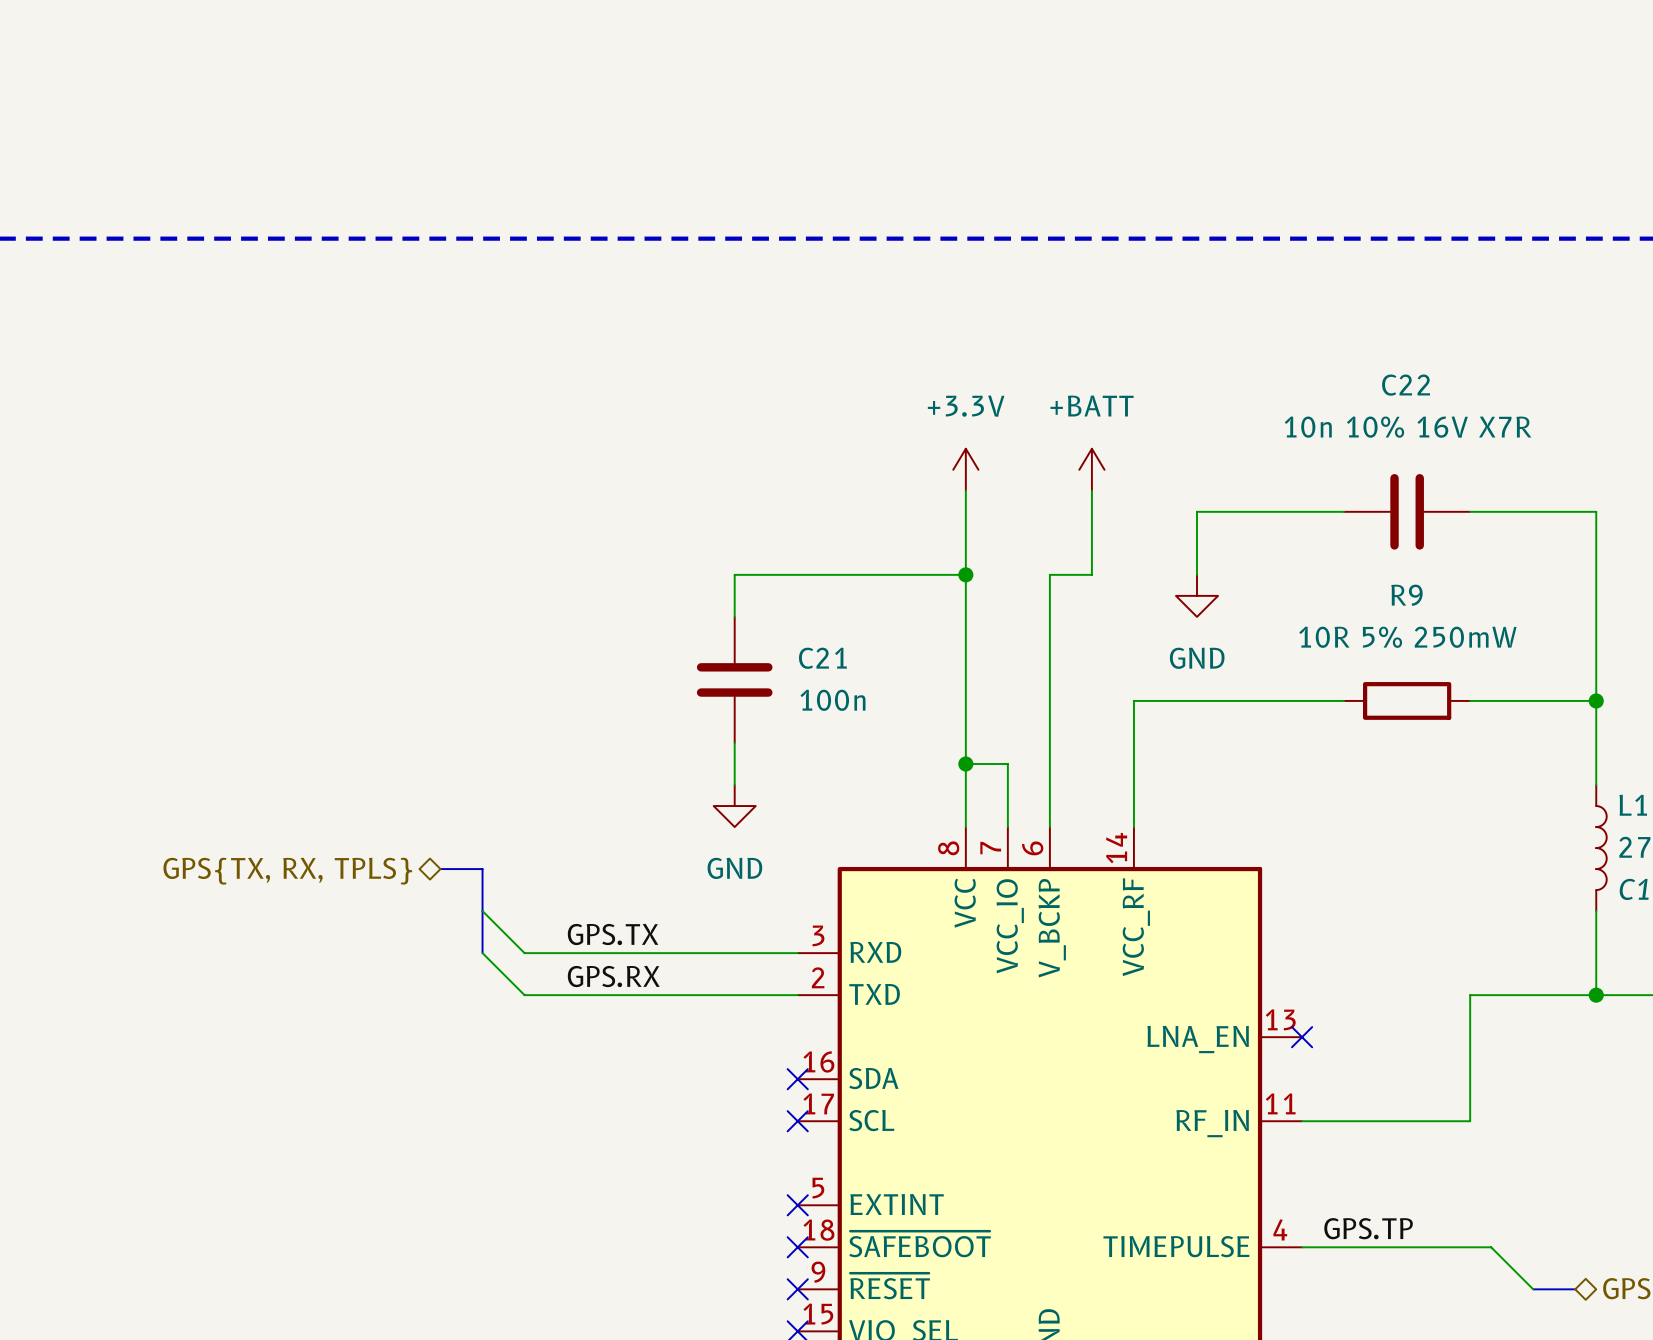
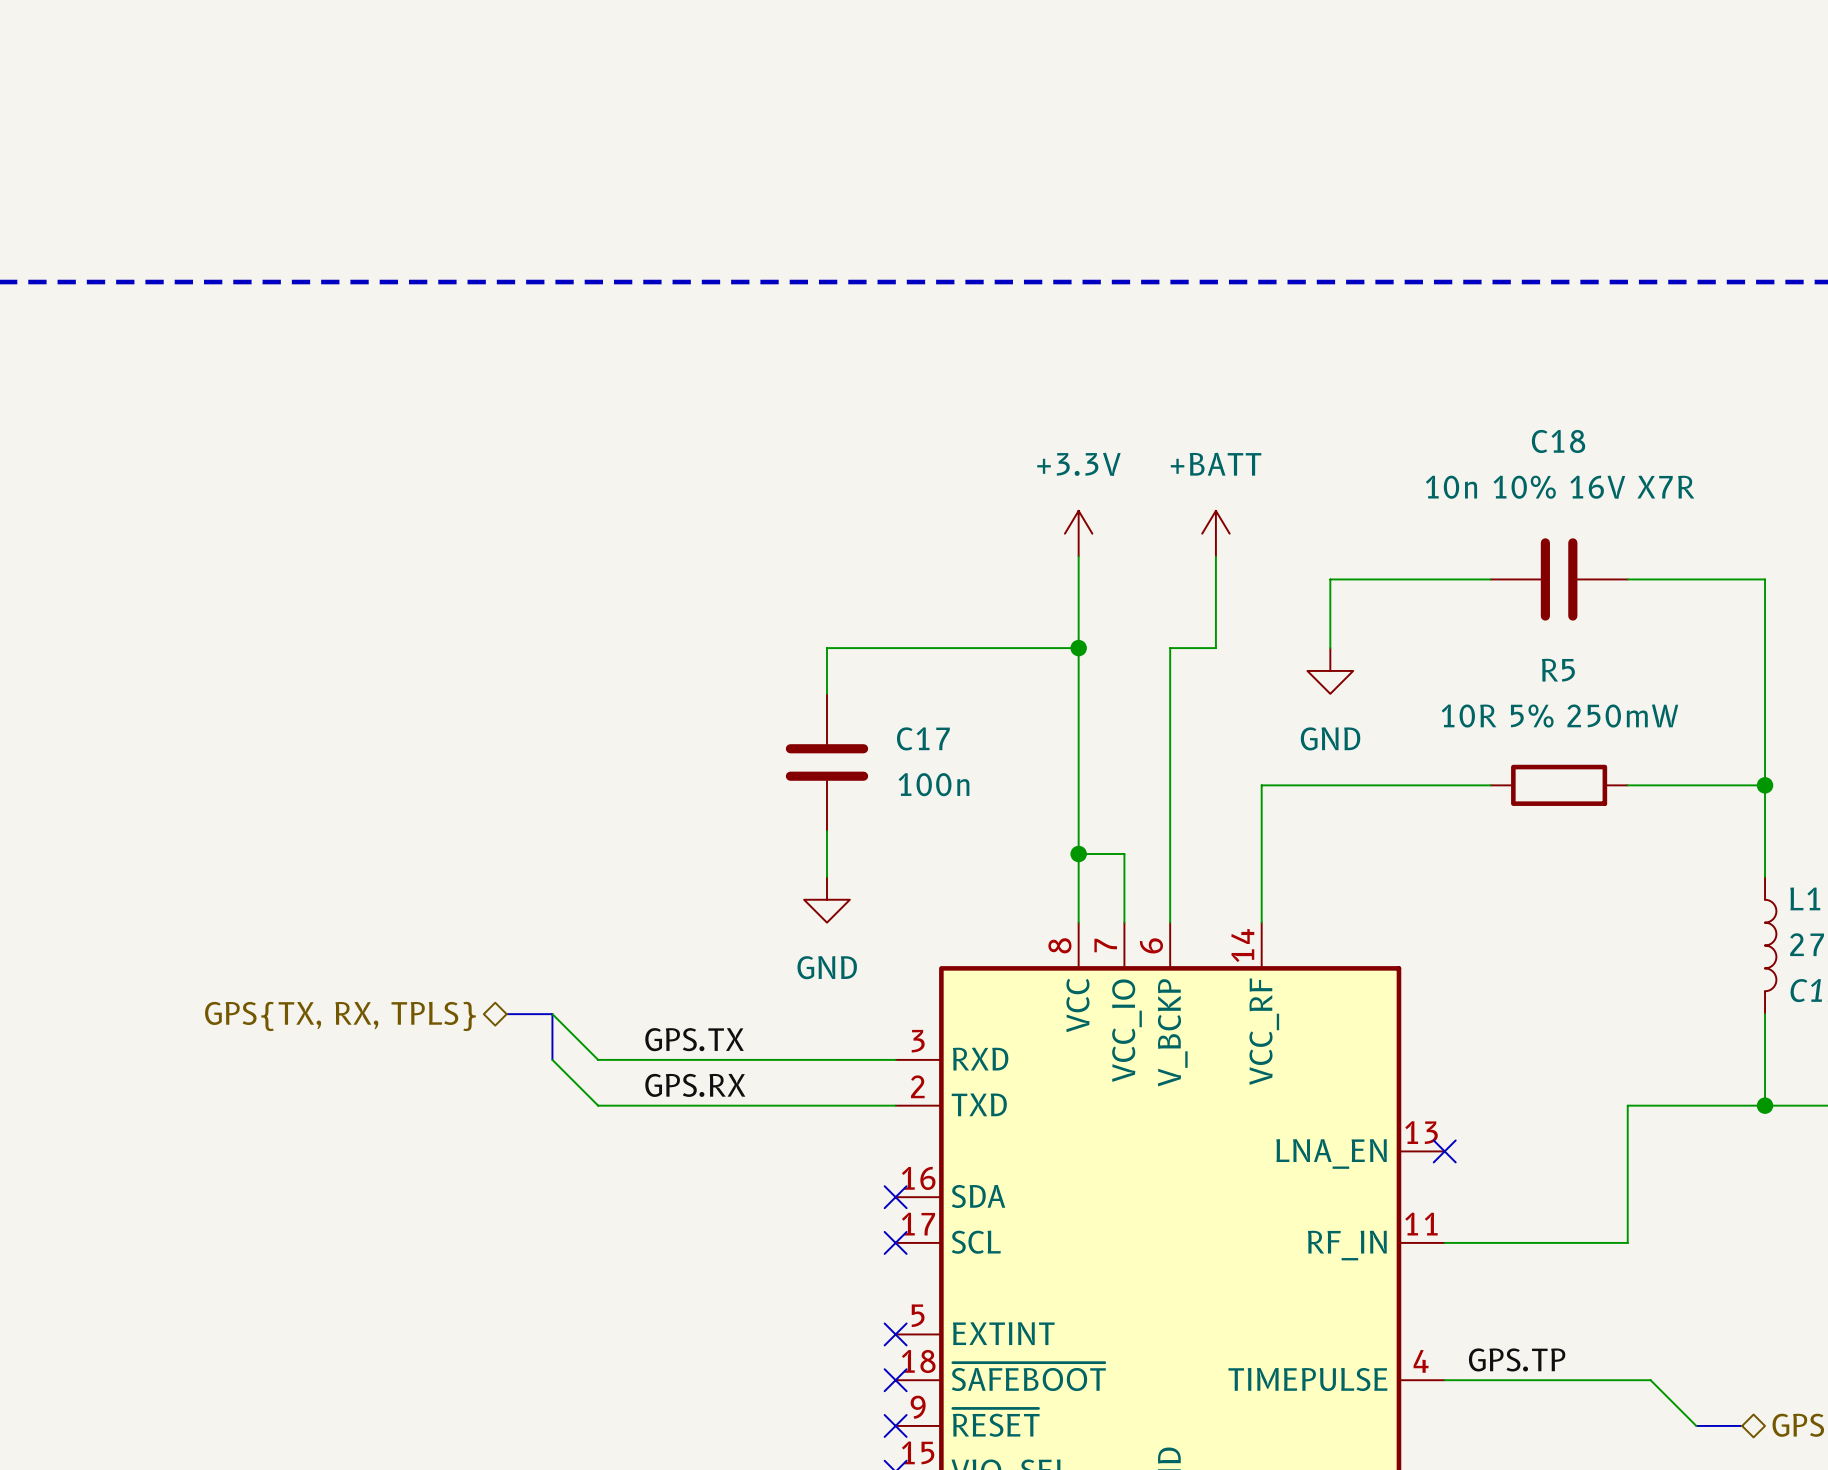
C22 name: C22 (1406, 385) -> C18 (1558, 441)
R9 name: R9 (1406, 595) -> R5 (1558, 670)
C21 name: C21 (822, 658) -> C17 (923, 738)
bus: (440, 869) (482, 869) (482, 911) -> (506, 1014) (552, 1014)
hierarchical label position: GPS{TX, RX, TPLS} (287, 871) -> GPS{TX, RX, TPLS} (340, 1016)

